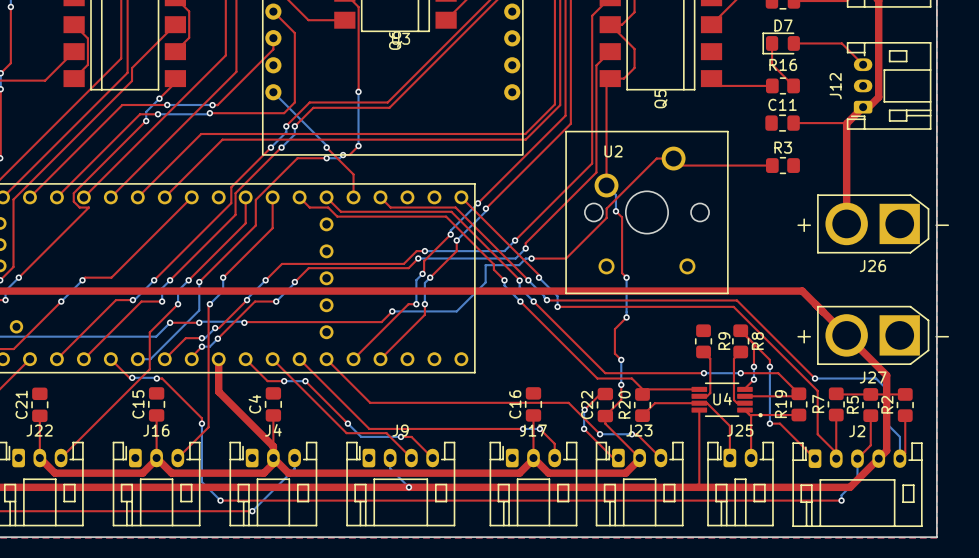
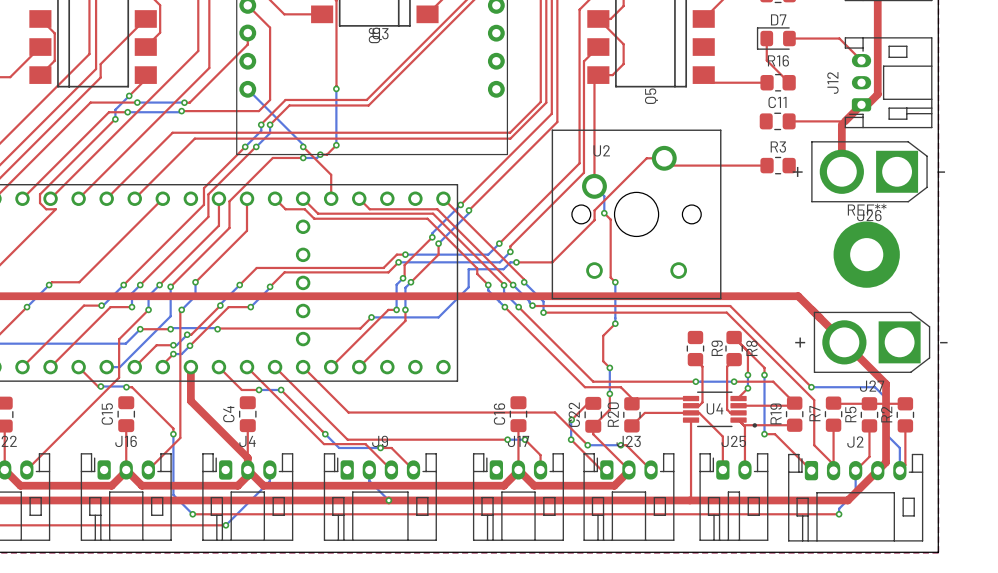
top track: (846, 123) (846, 223) -> (844, 121) (841, 124) (841, 171)
J26 position: (873, 223) -> (869, 171)
REF**: none -> (866, 254)

